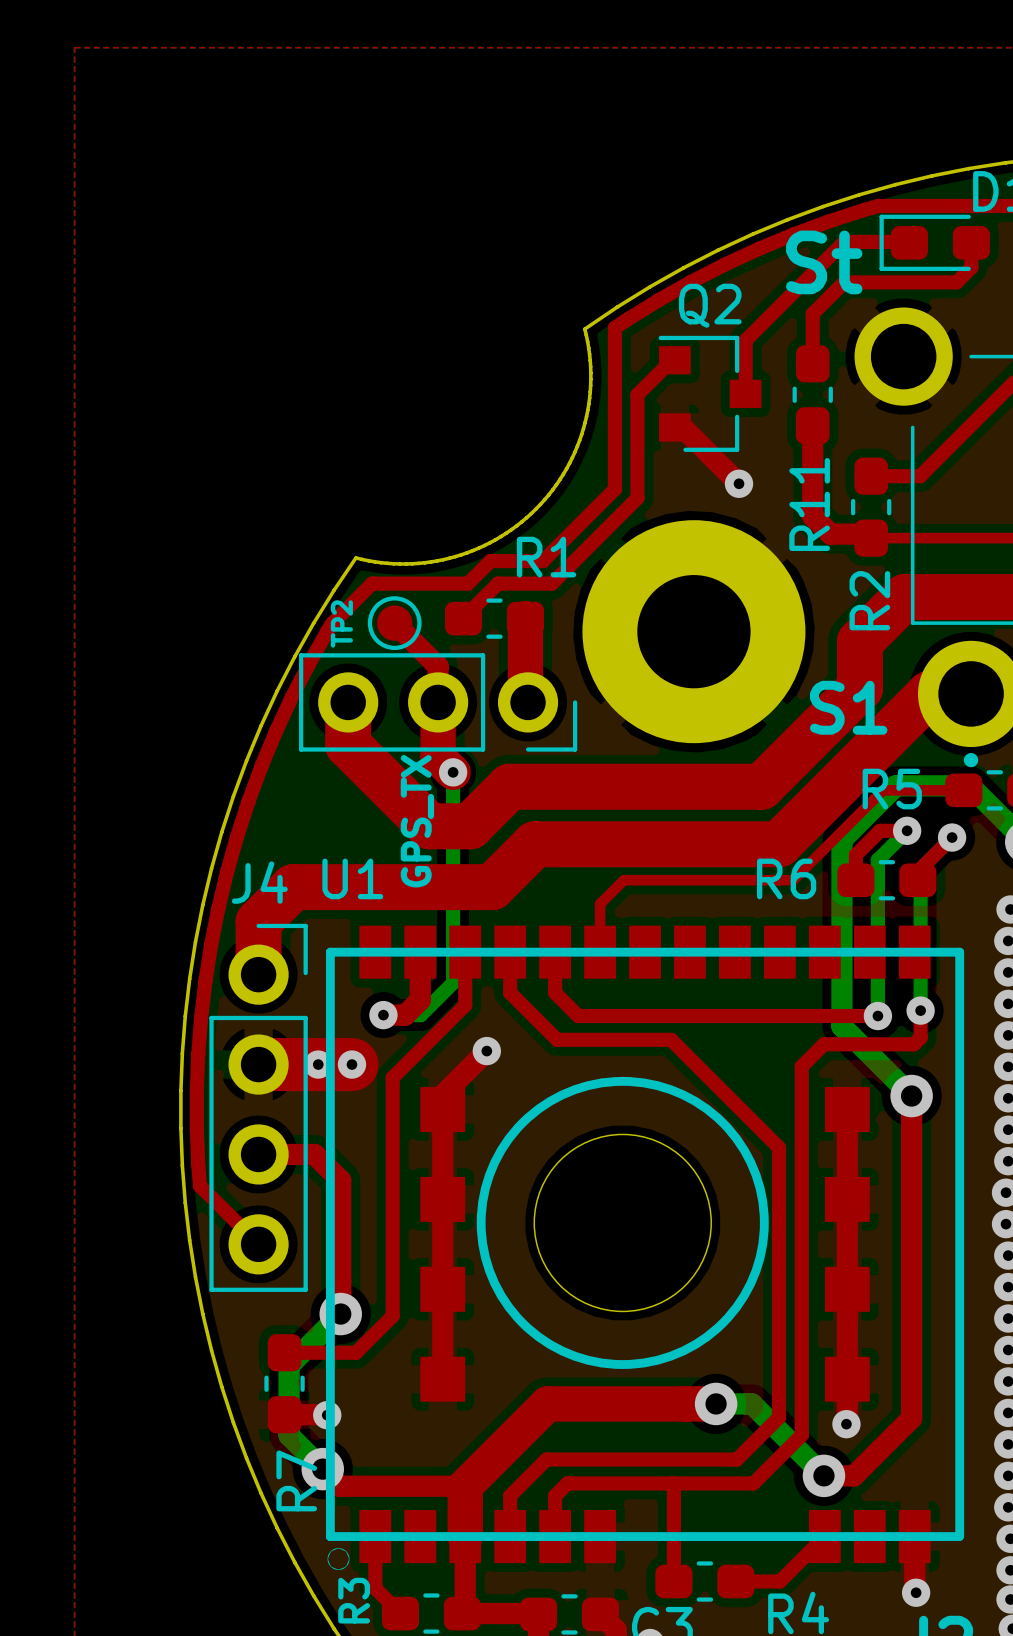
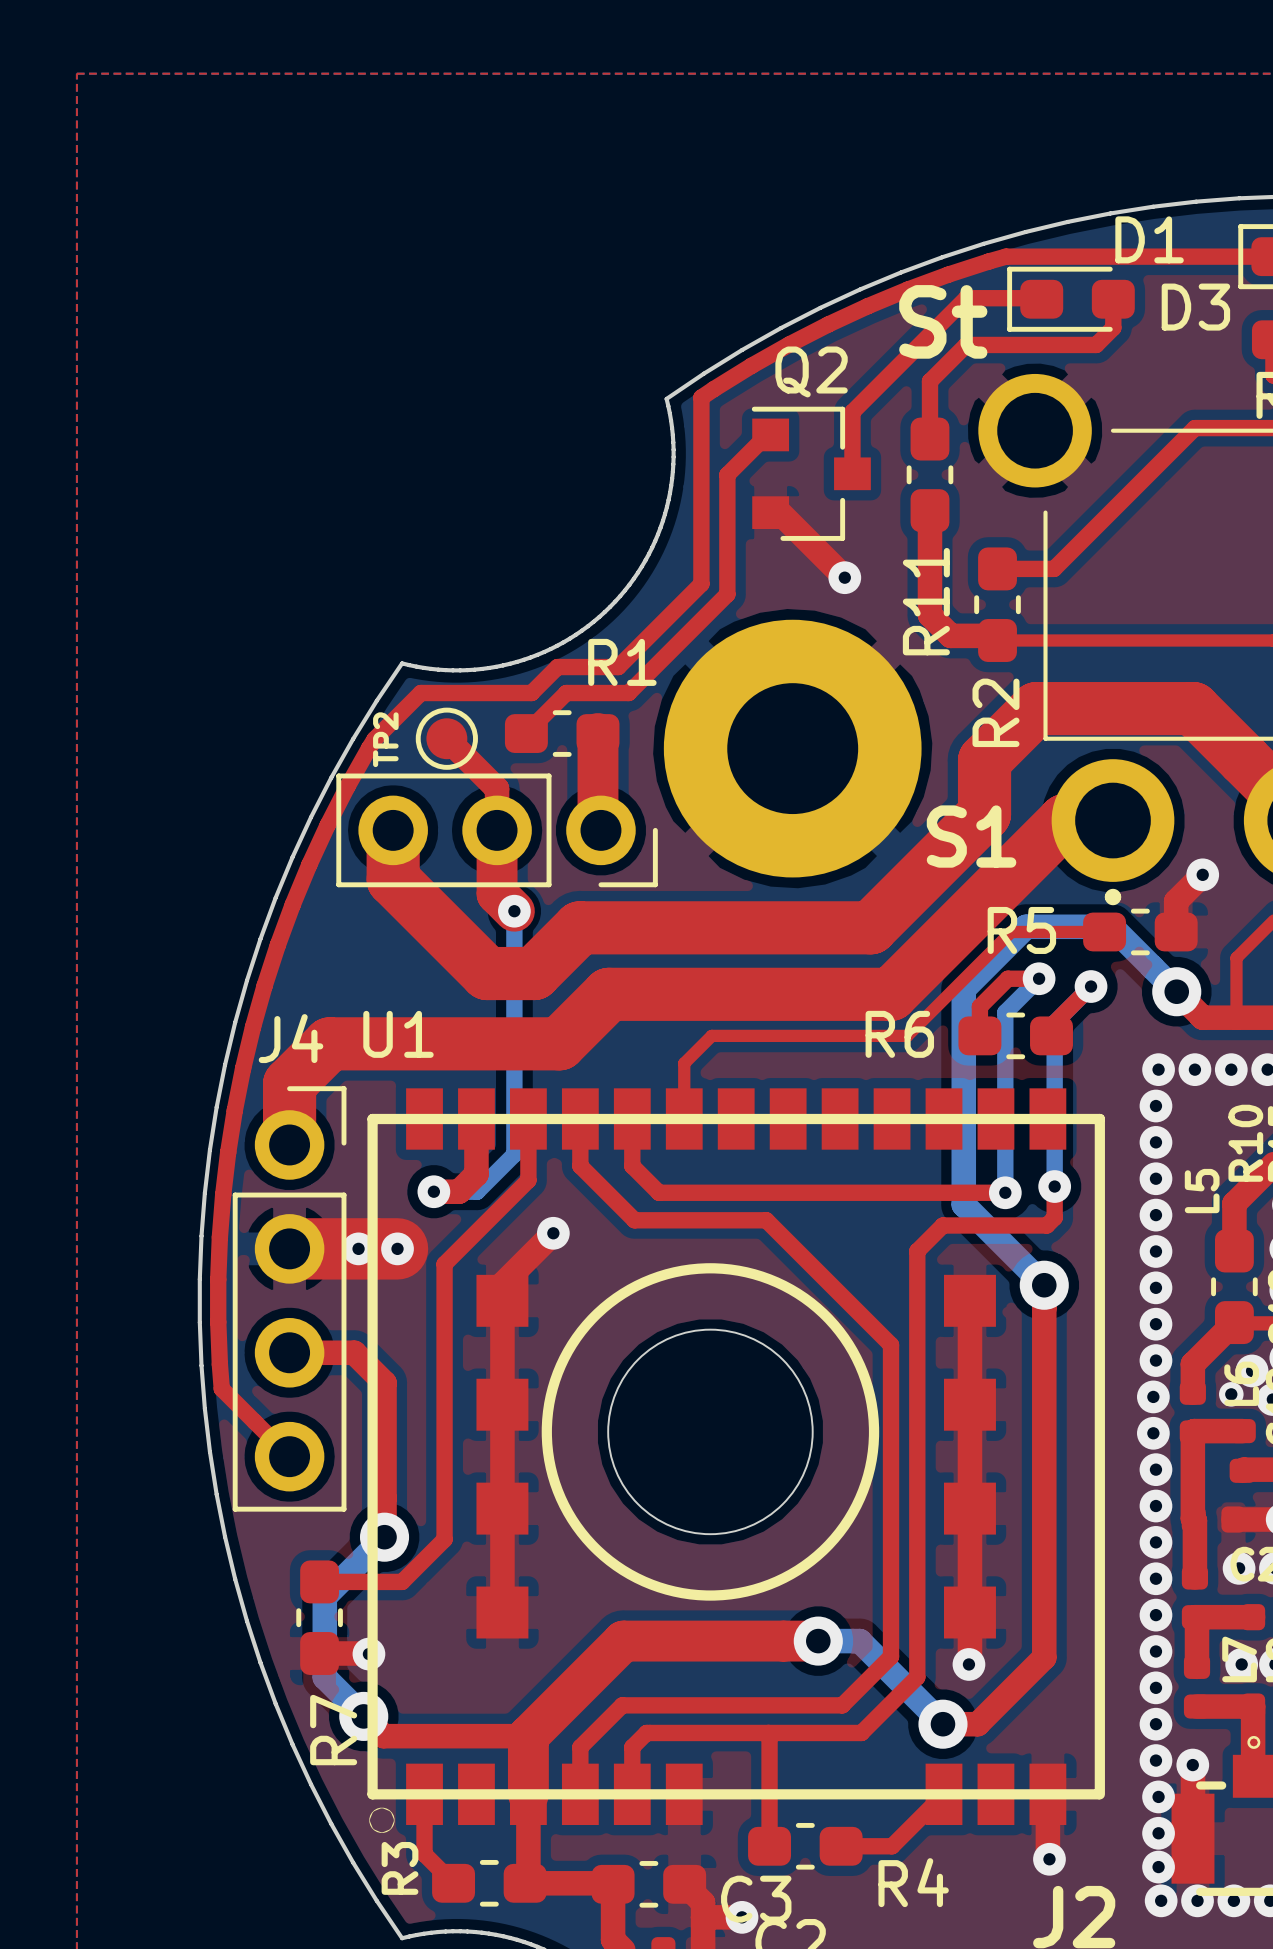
text: GPS_TX (417, 821) -> none

